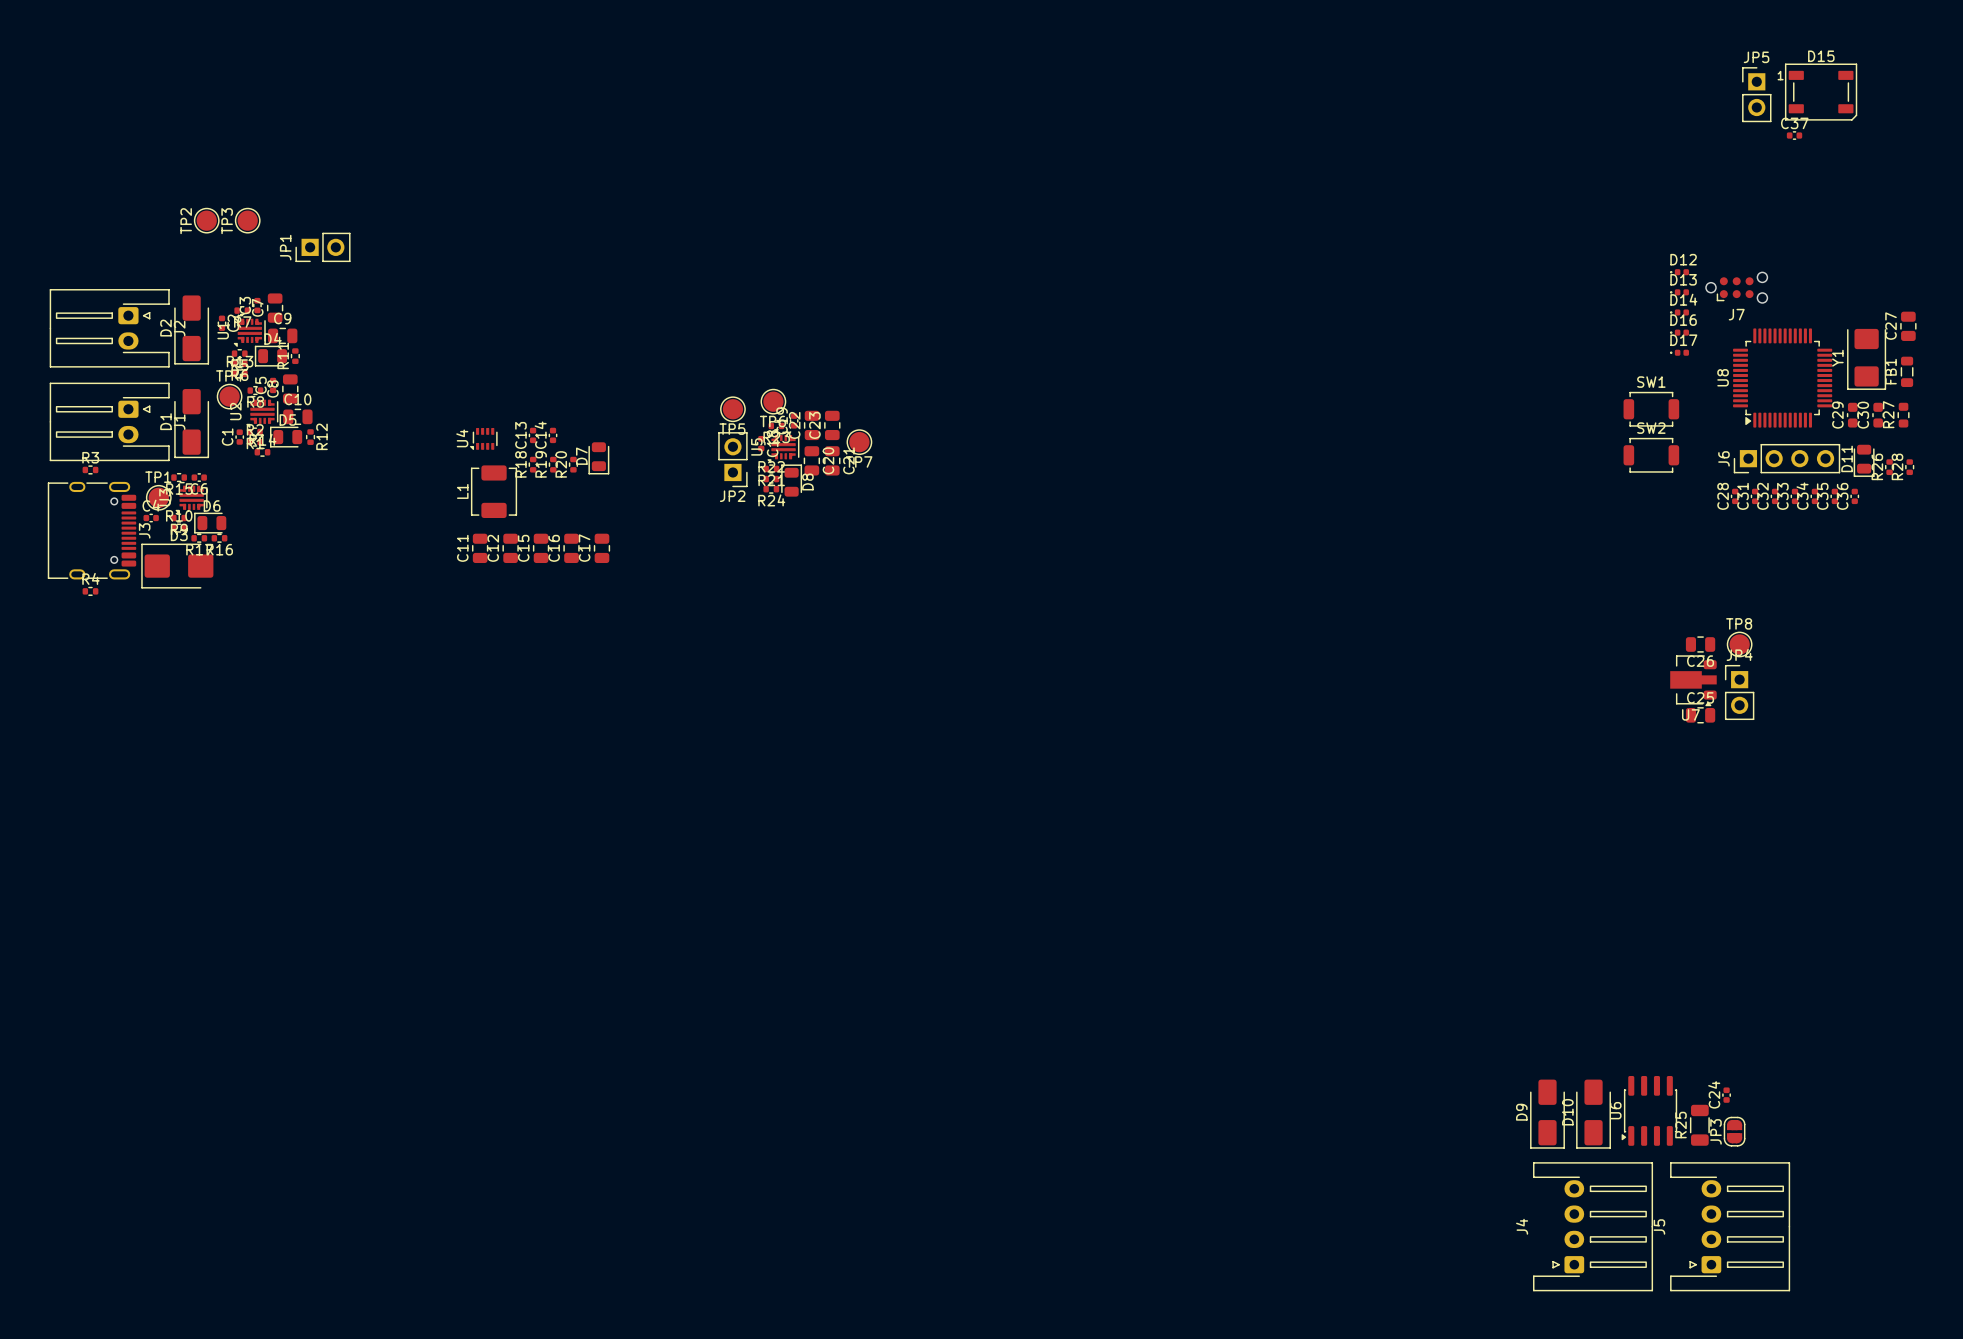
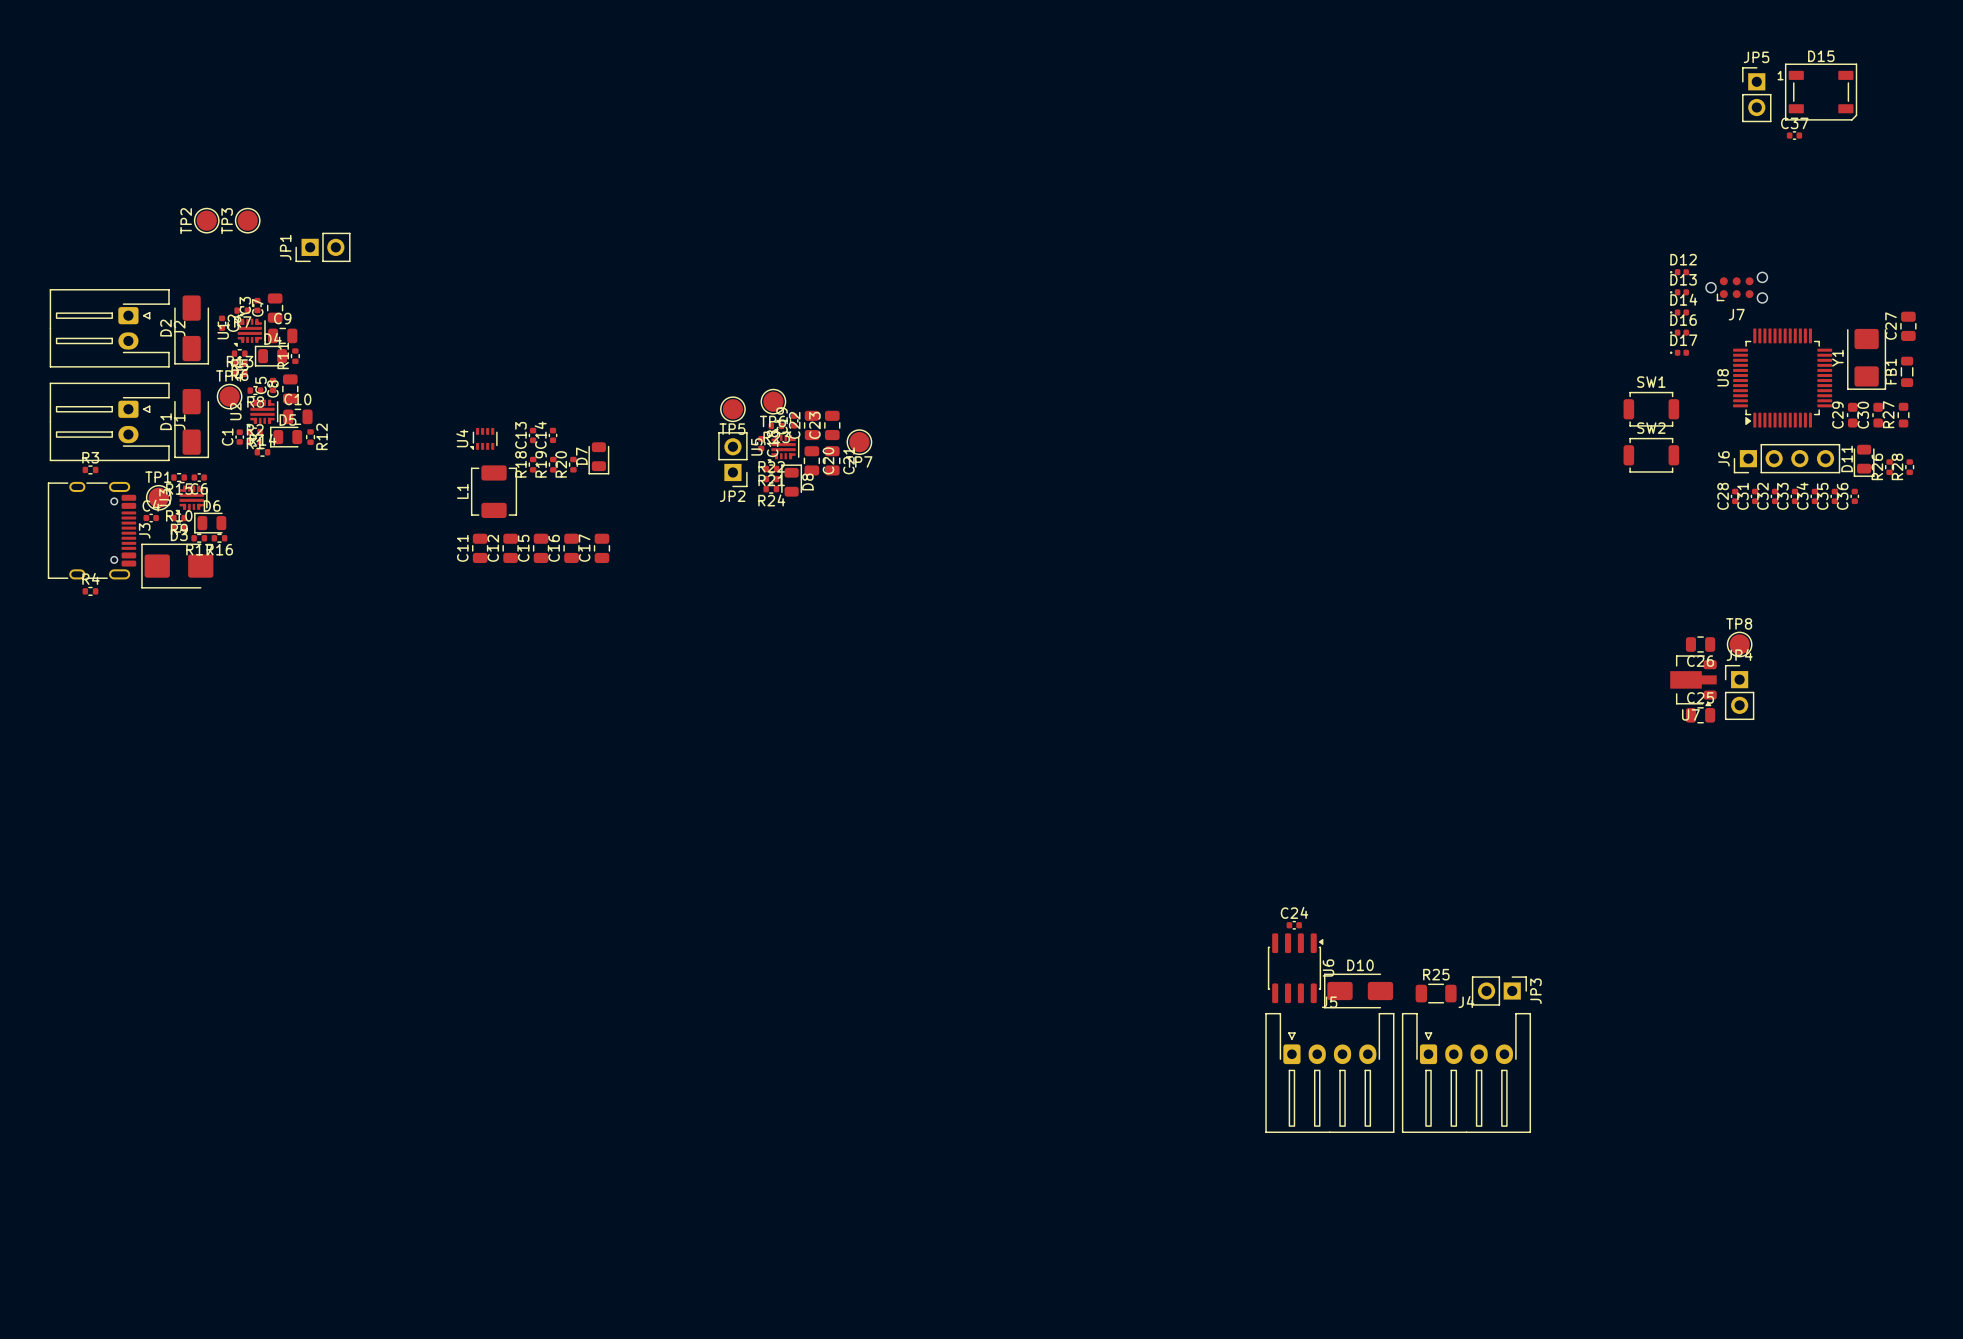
C24 rotation: 0° (1726, 1095) -> 90° clockwise (1294, 925)
C24 position: (1726, 1095) -> (1294, 925)
U6 rotation: 0° (1649, 1110) -> 180° (1295, 968)
U6 position: (1649, 1110) -> (1295, 968)
D9: (1547, 1114) -> none
D10 rotation: 0° (1593, 1114) -> 90° clockwise (1358, 991)
D10 position: (1593, 1114) -> (1358, 991)
JP3 footprint: [1723, 1116, 1746, 1147] -> [1471, 976, 1527, 1006]
R25 rotation: 0° (1699, 1125) -> 90° clockwise (1436, 993)
R25 position: (1699, 1125) -> (1436, 993)
JP3 name position: JP3 (1715, 1131) -> JP3 (1535, 991)
J4 rotation: 0° (1593, 1226) -> 90° clockwise (1466, 1072)
J4 position: (1593, 1226) -> (1466, 1072)
J5 rotation: 0° (1730, 1226) -> 90° clockwise (1329, 1072)
J5 position: (1730, 1226) -> (1329, 1072)

